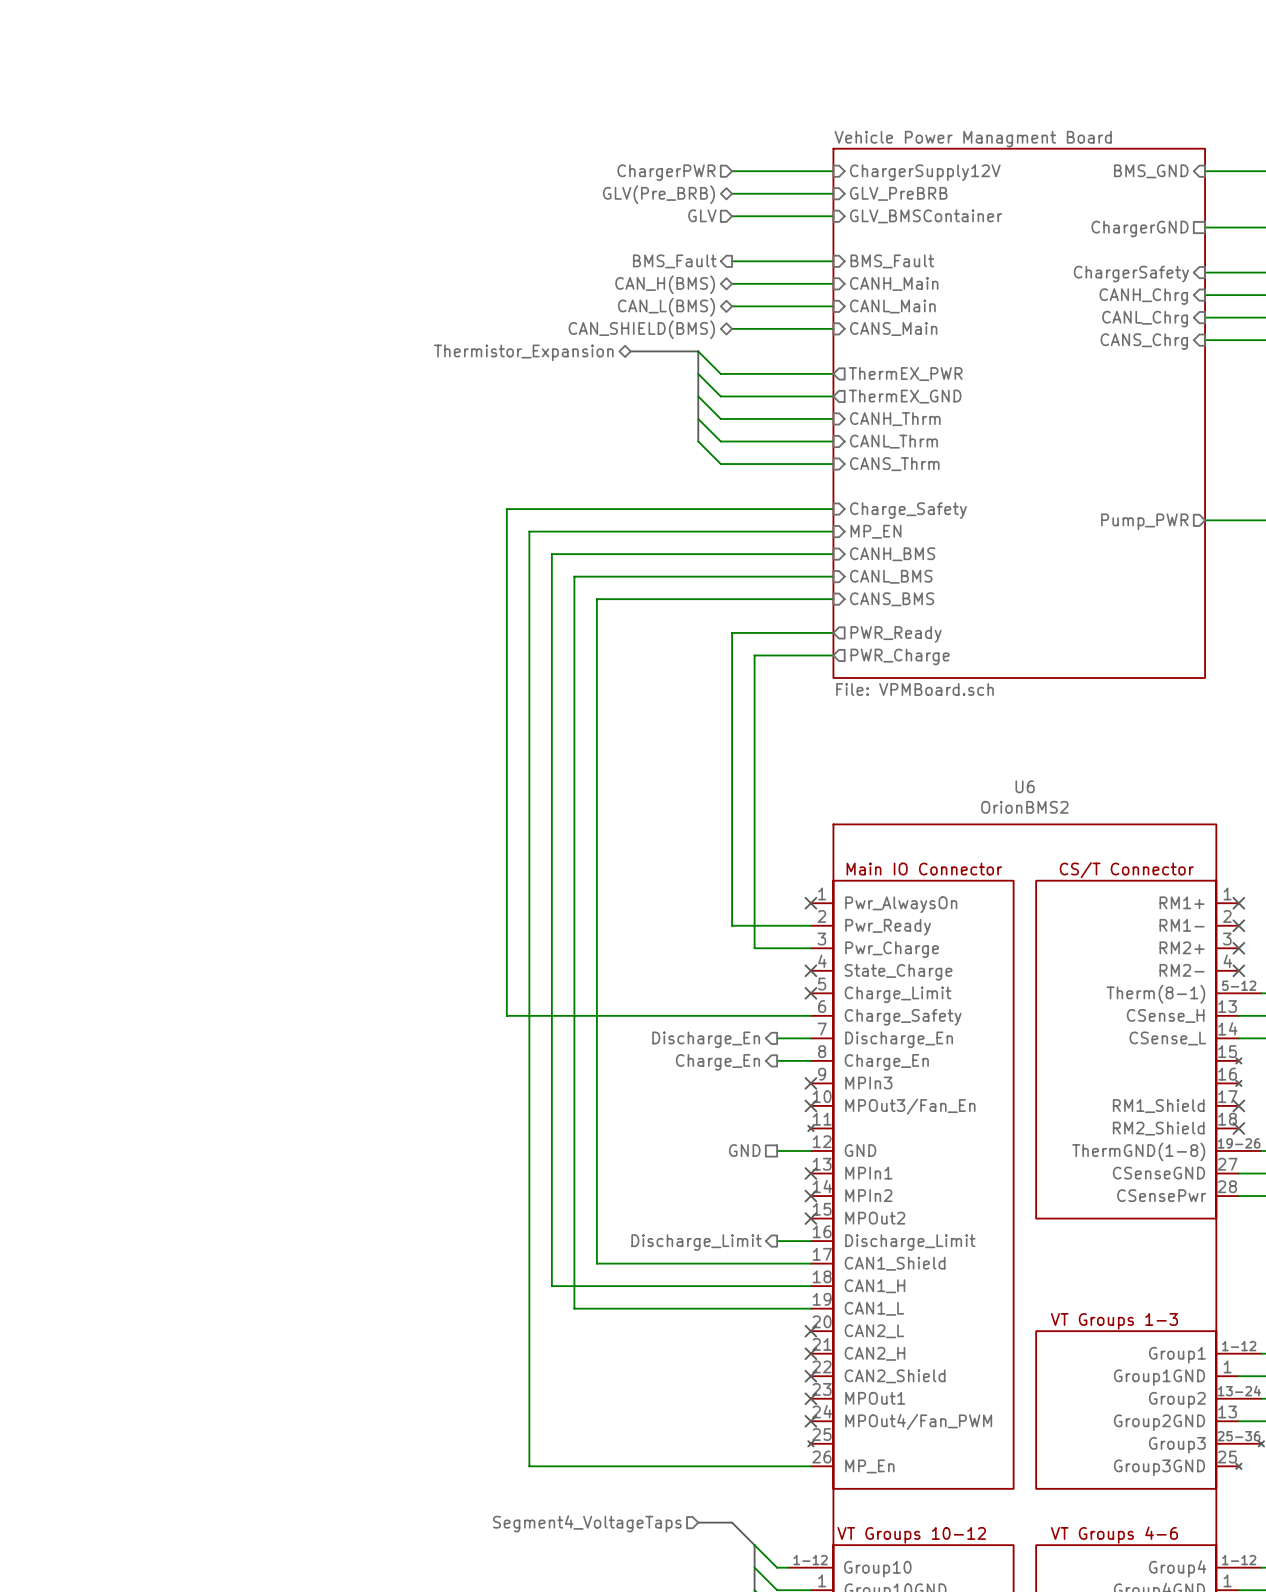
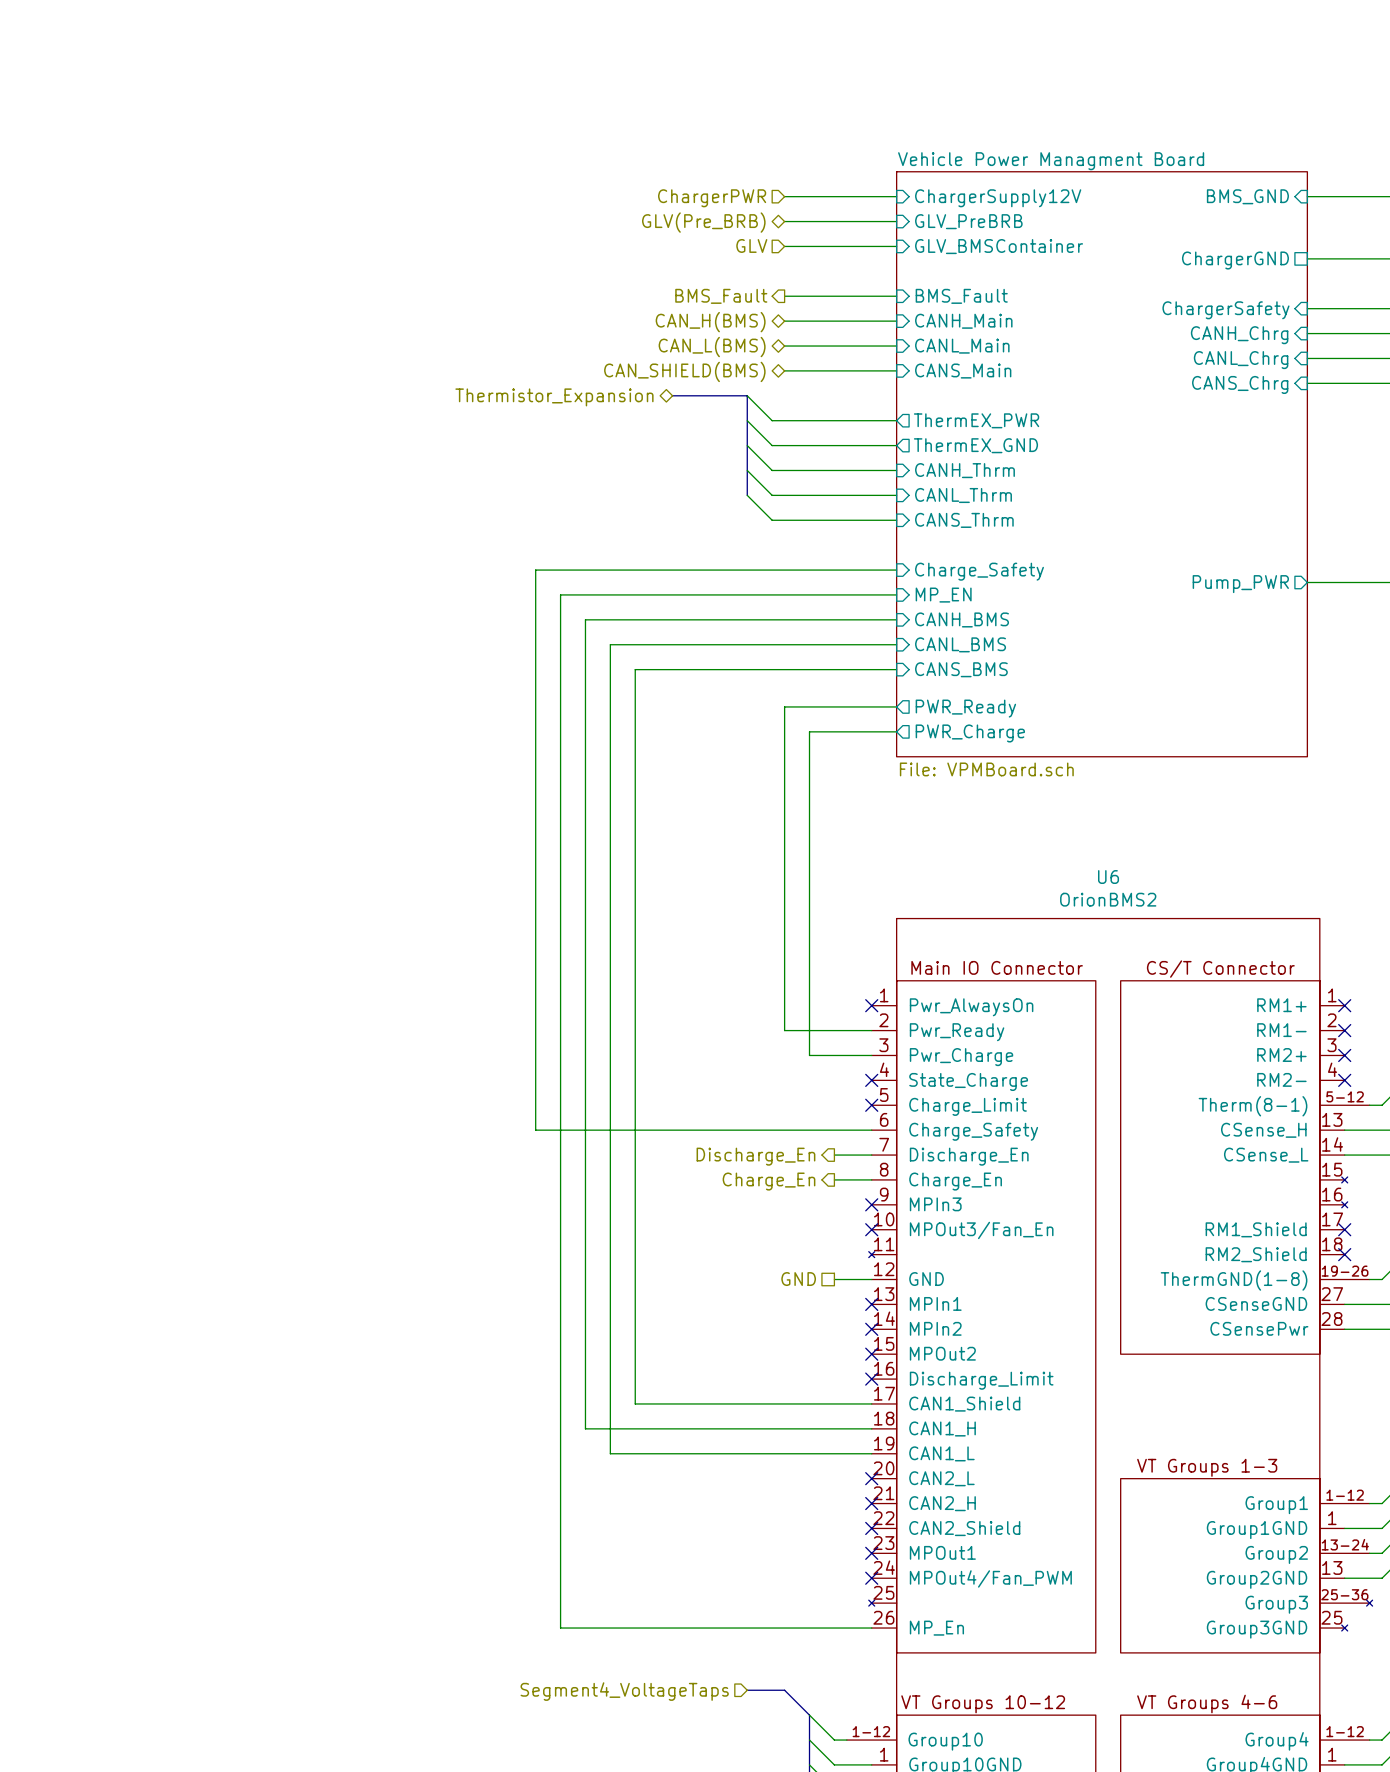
wire: (777, 1241) (810, 1241) -> none
no-connect mark: none -> (871, 1379)
hierarchical label: Discharge_Limit (696, 1242) -> none

